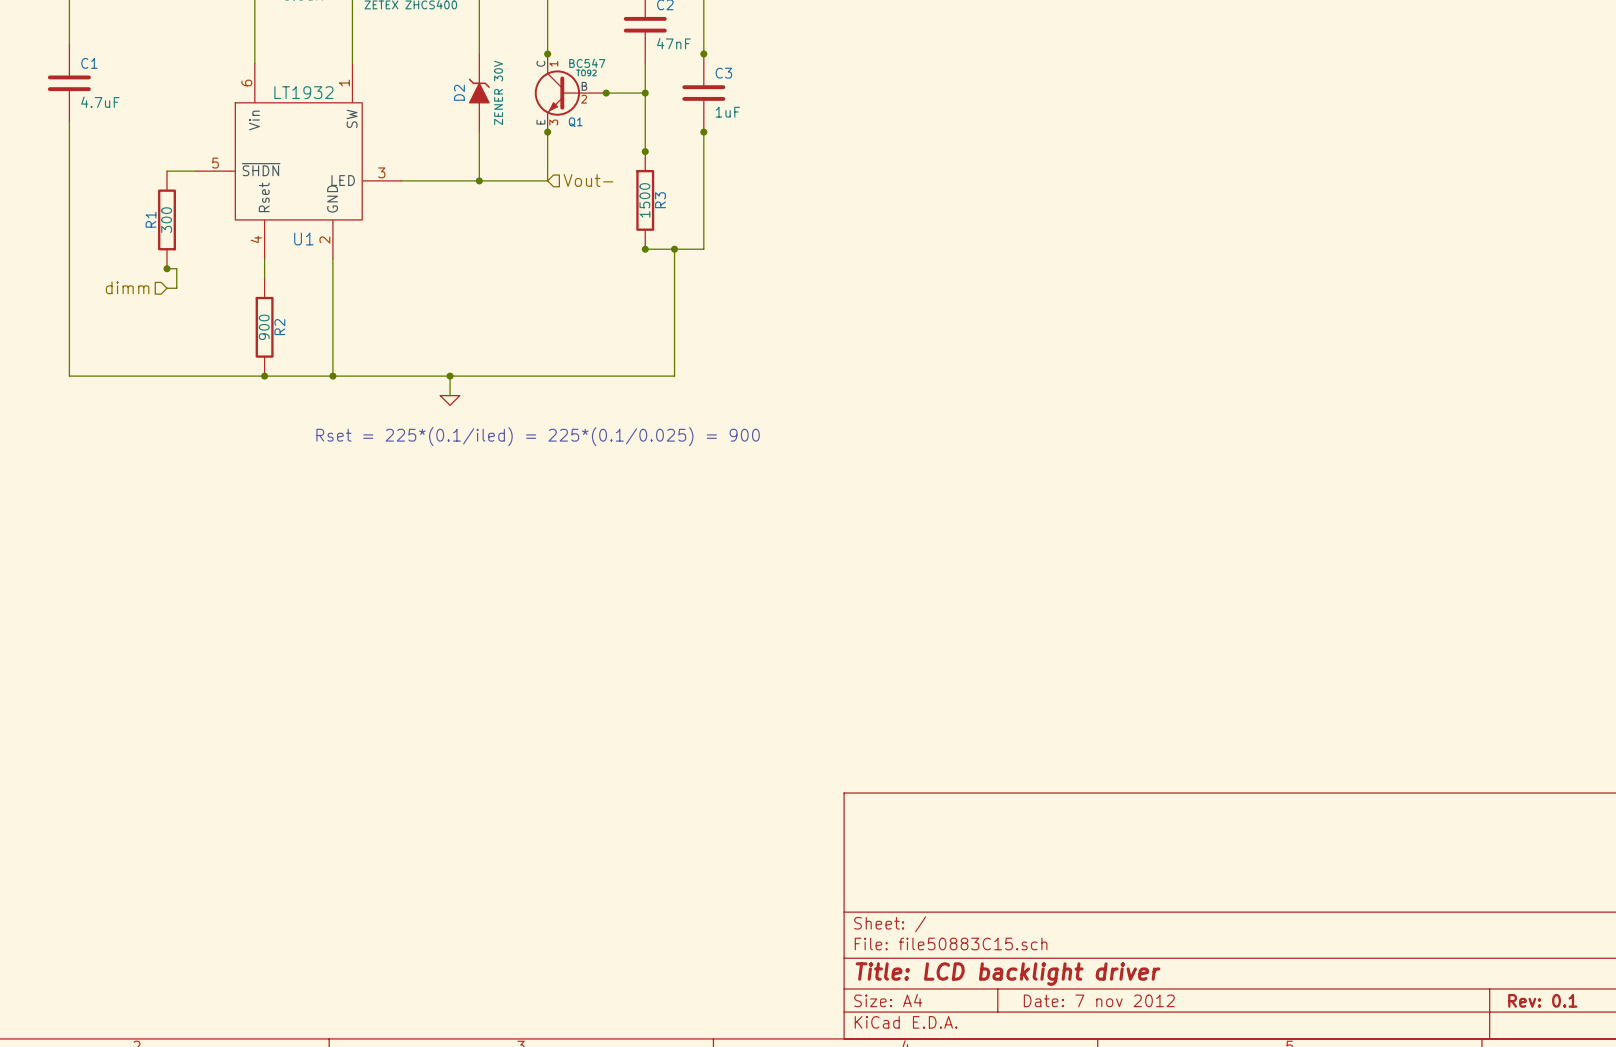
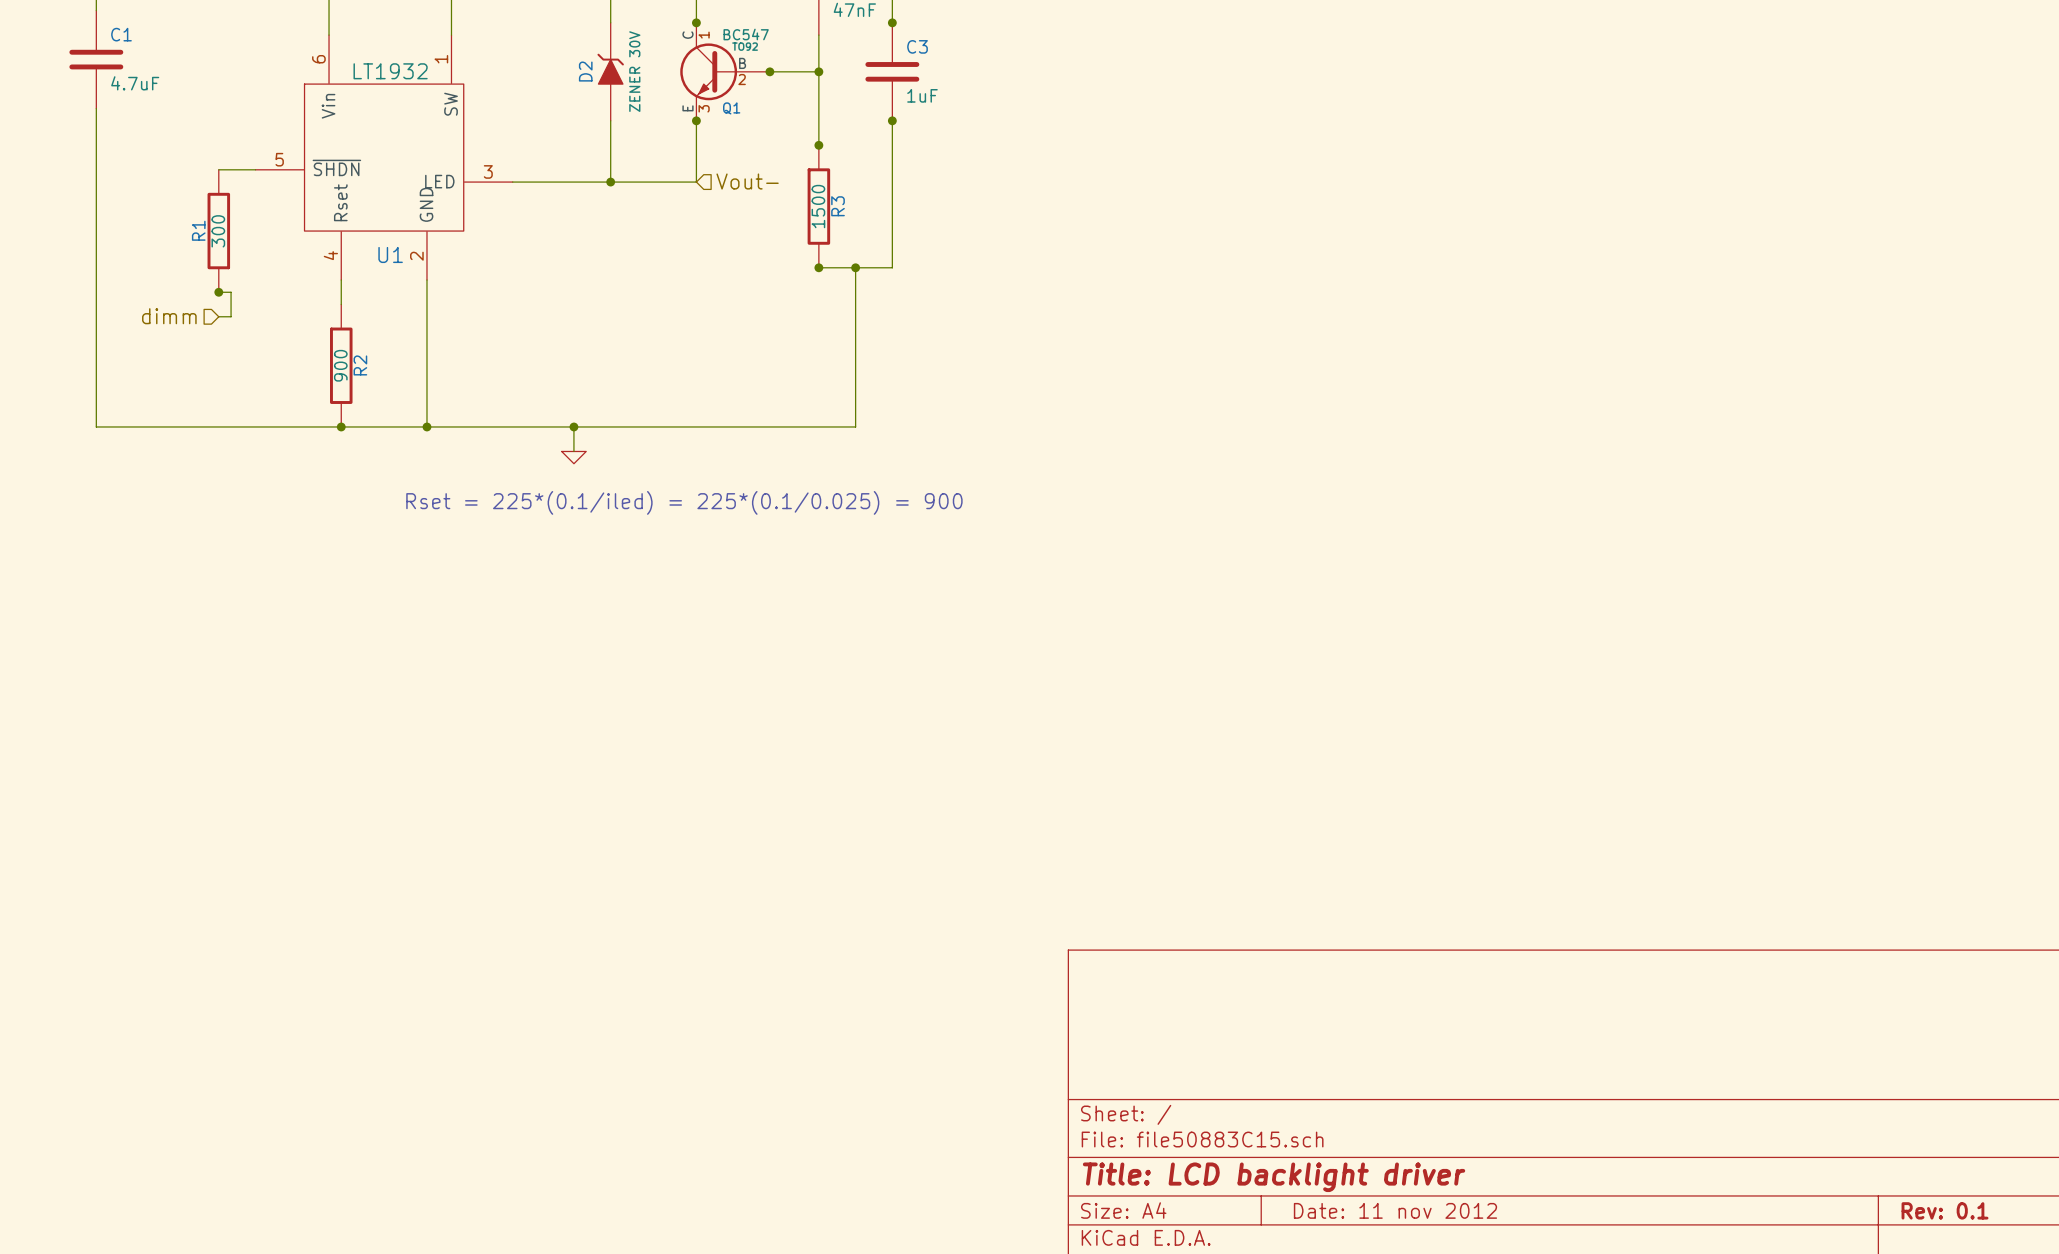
title block: Date: 7 nov 2012 (1099, 1000) -> Date: 11 nov 2012 (1395, 1210)

